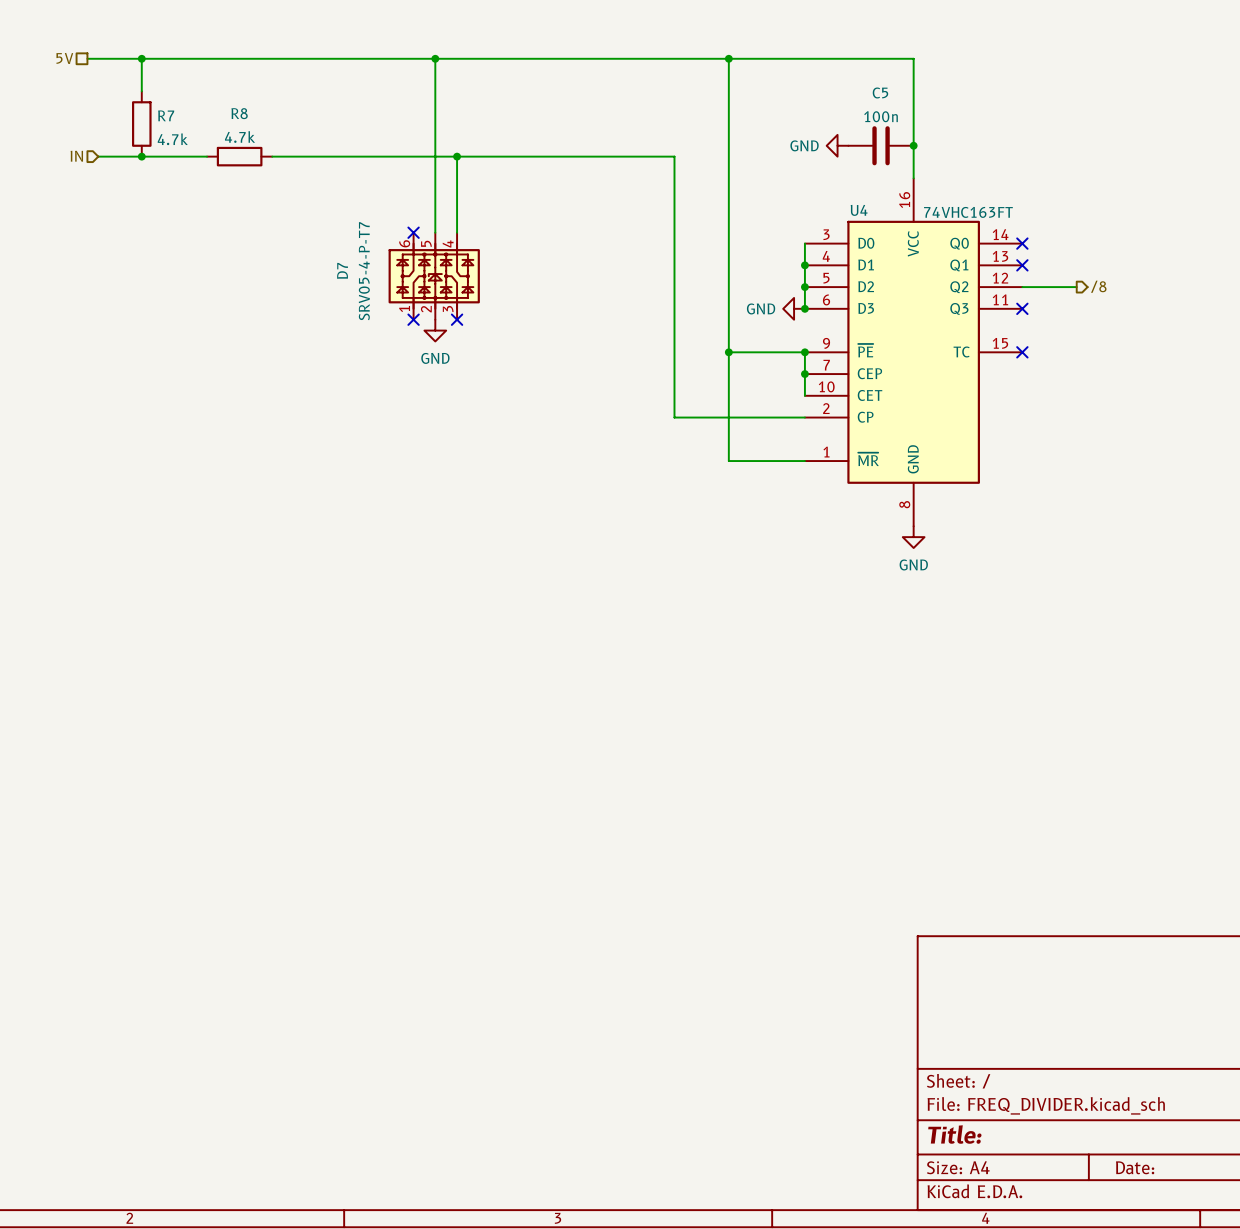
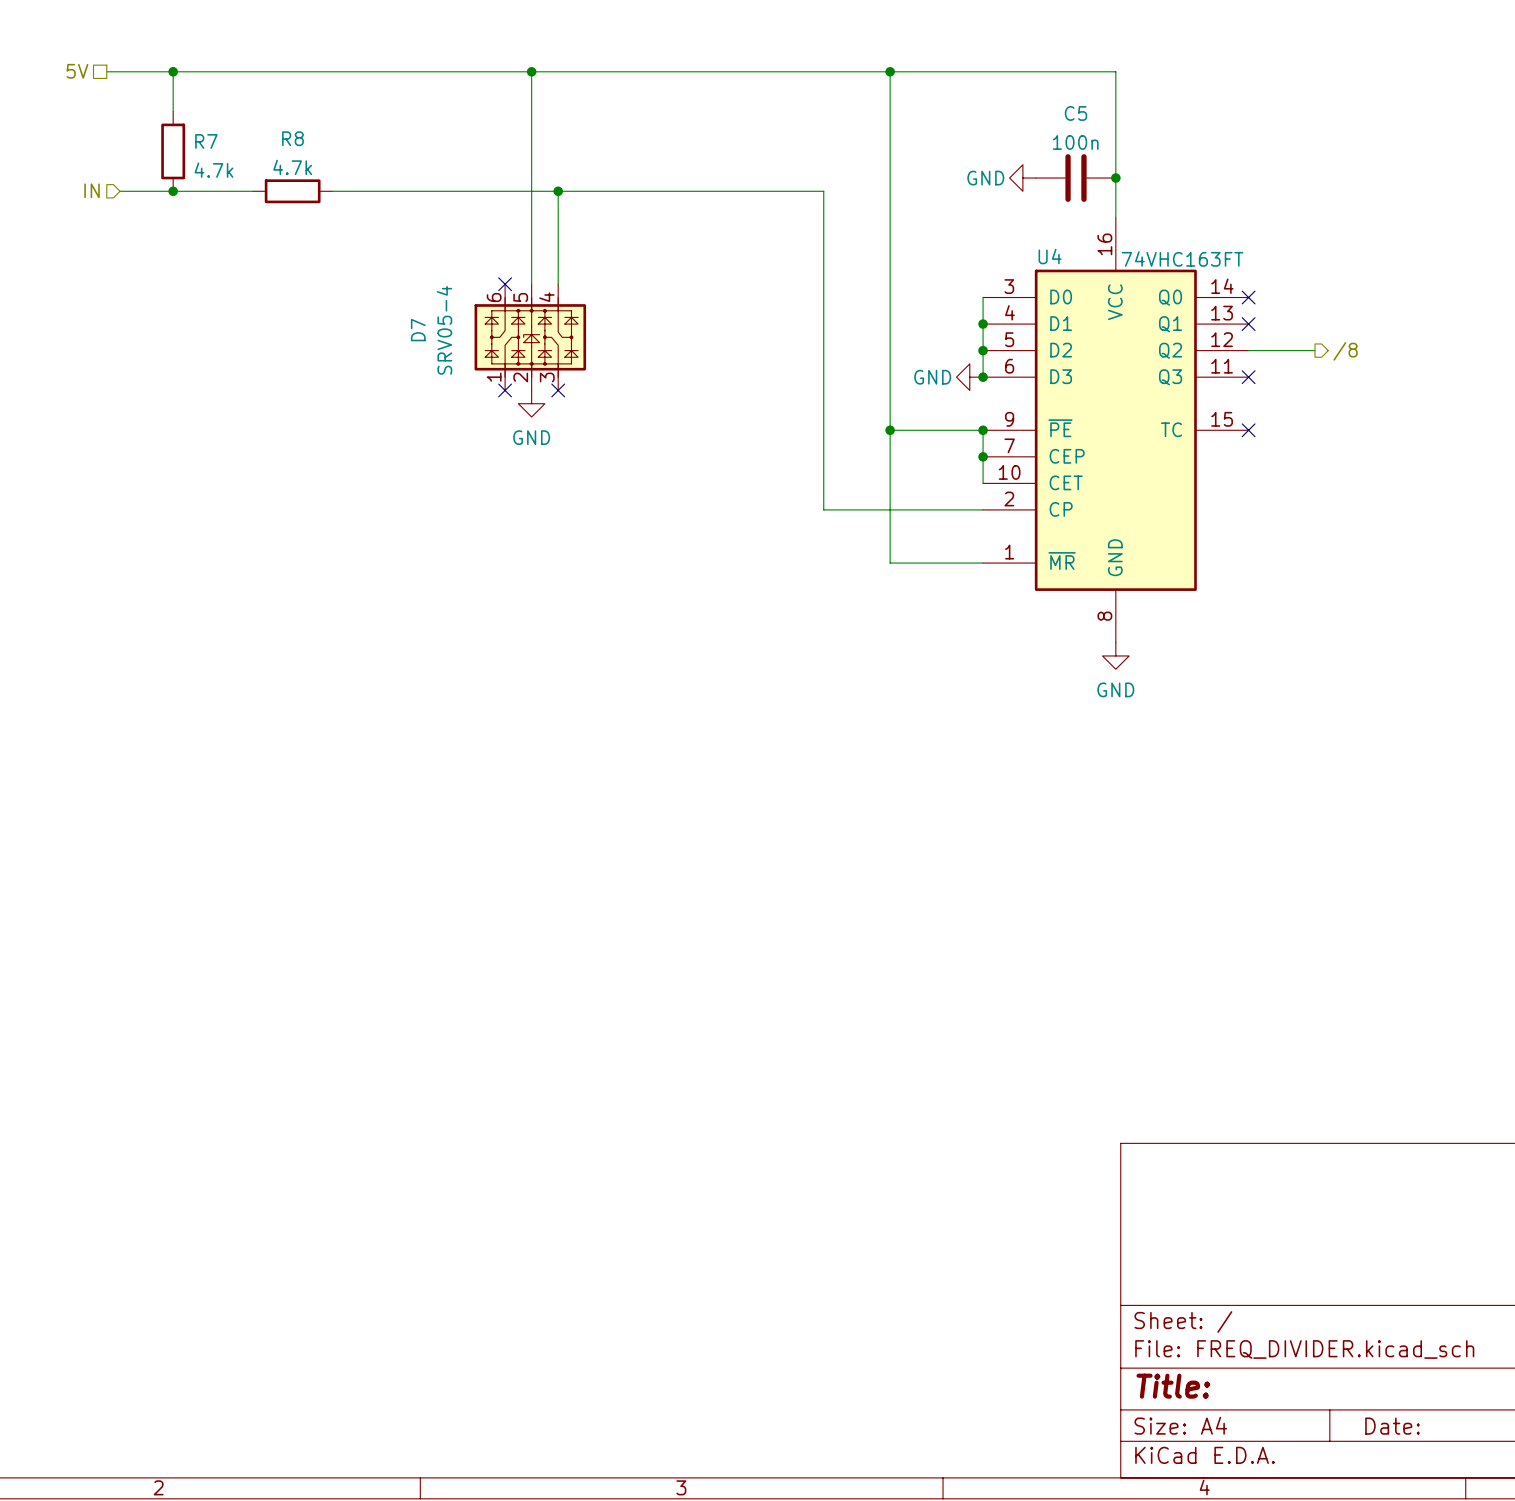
D7 value: SRV05-4-P-T7 (364, 271) -> SRV05-4 (444, 330)

